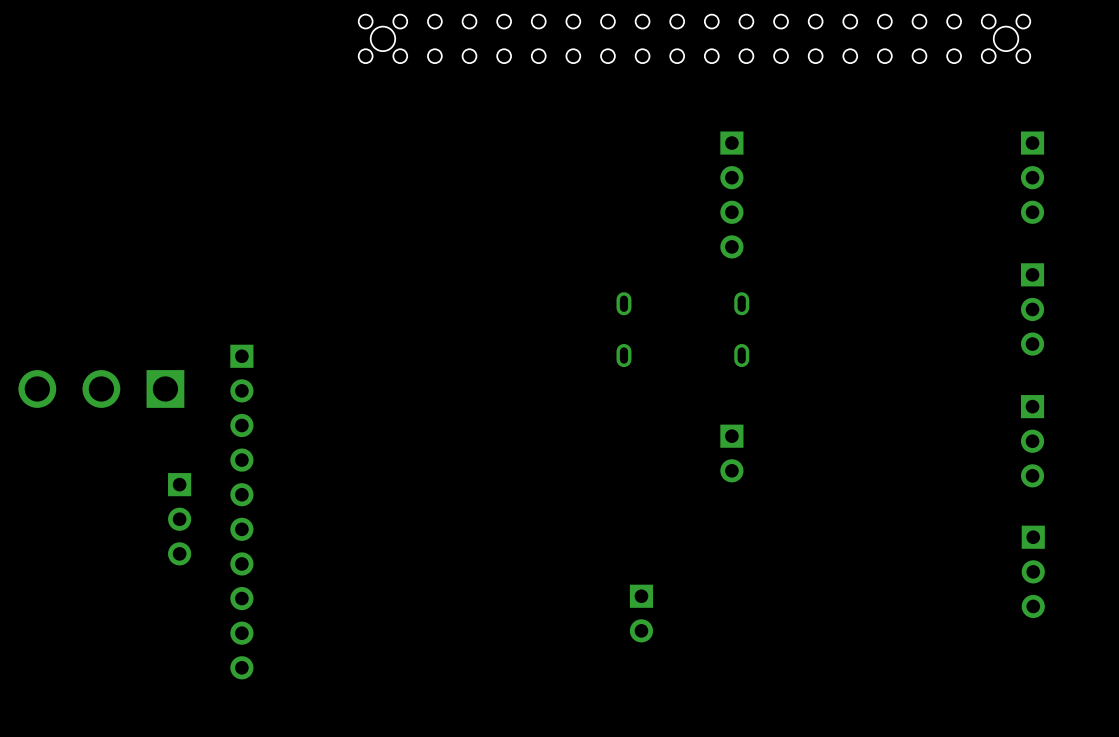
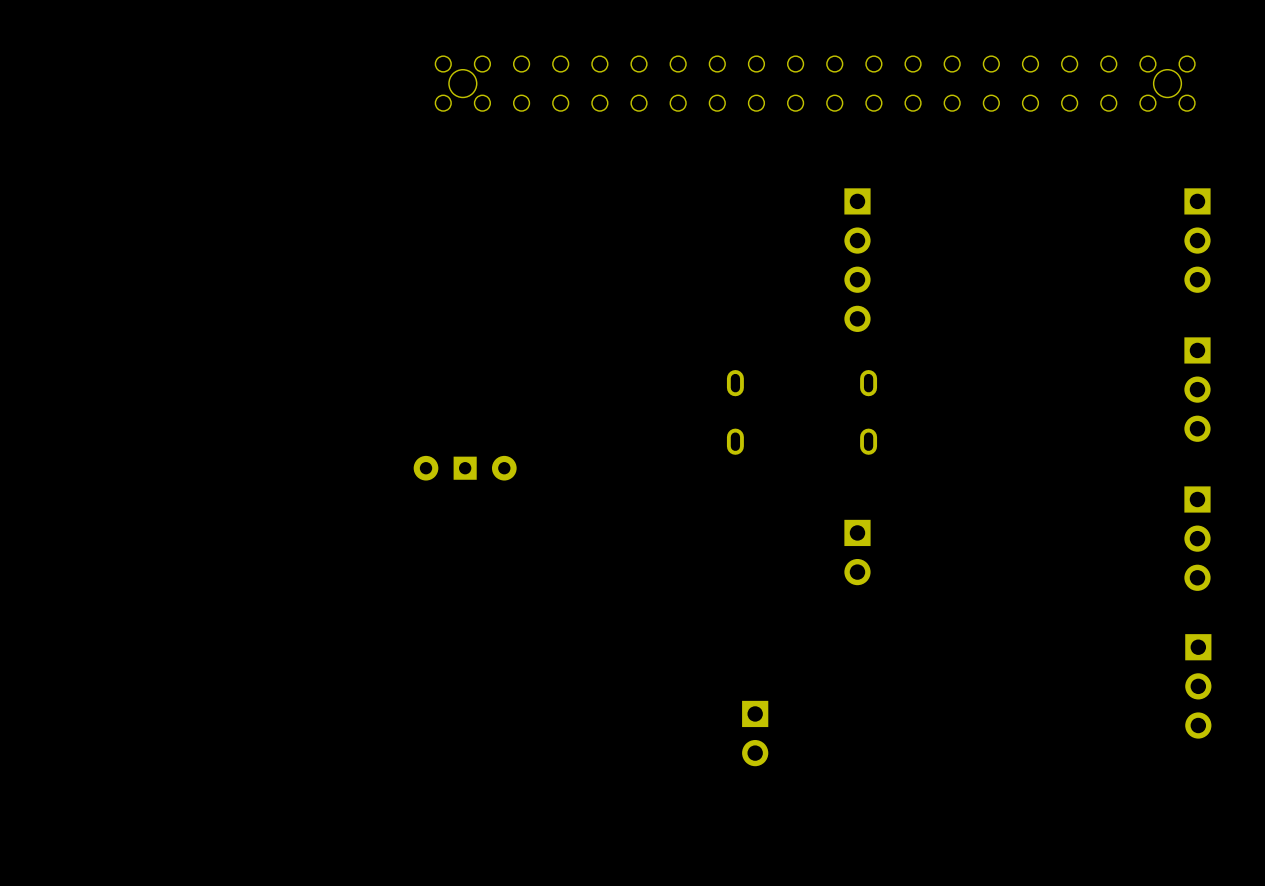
part: none -> (465, 468)
part: (101, 388) -> none
part: (241, 512) -> none
part: (179, 519) -> none

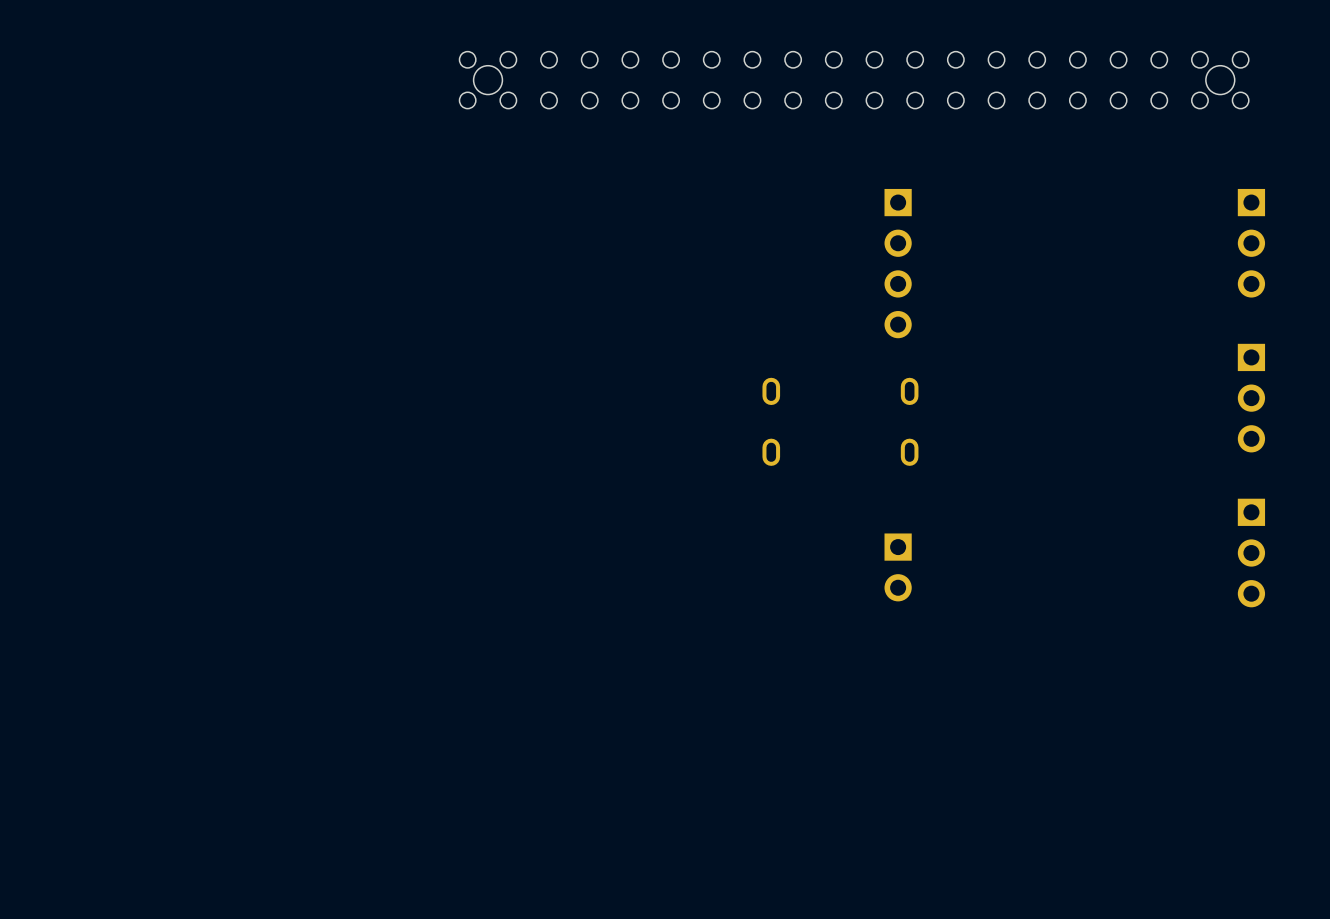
part: (465, 468) -> none
part: (1198, 686) -> none
part: (755, 733) -> none

